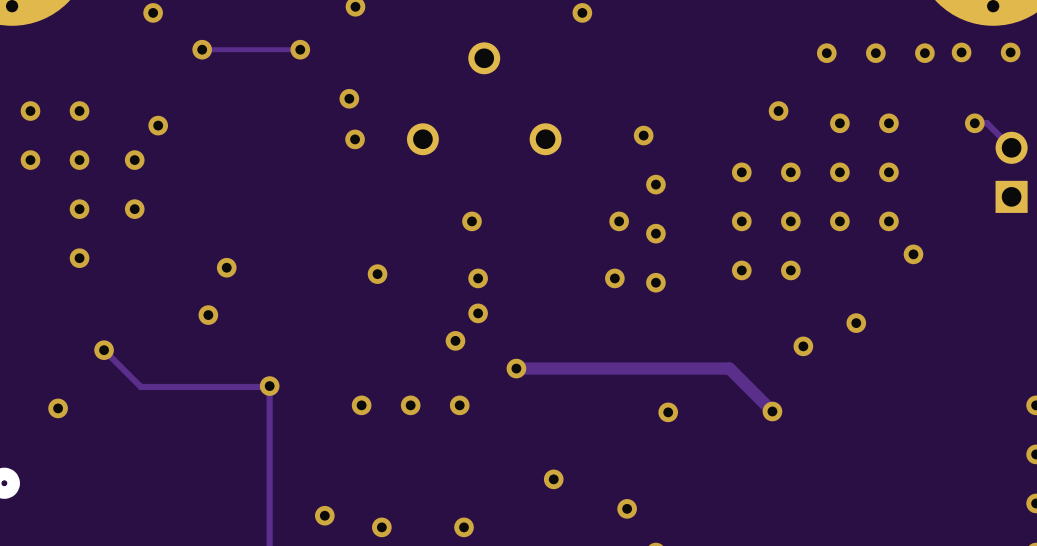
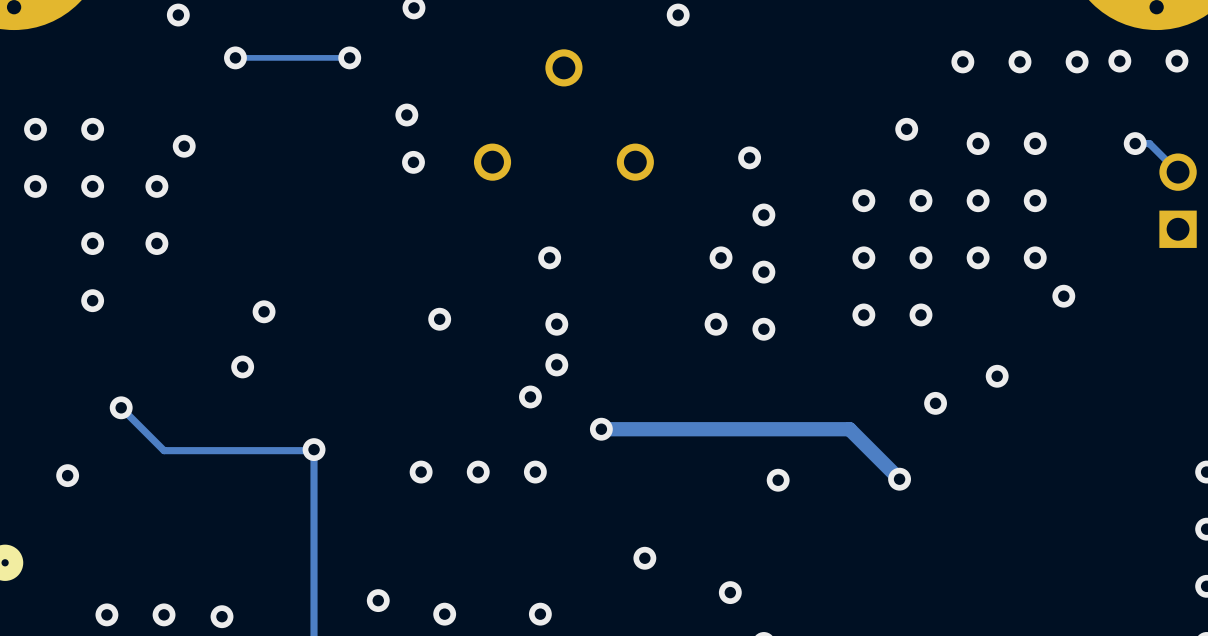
via: none -> (106, 614)
via: none -> (164, 614)
via: none -> (222, 616)

